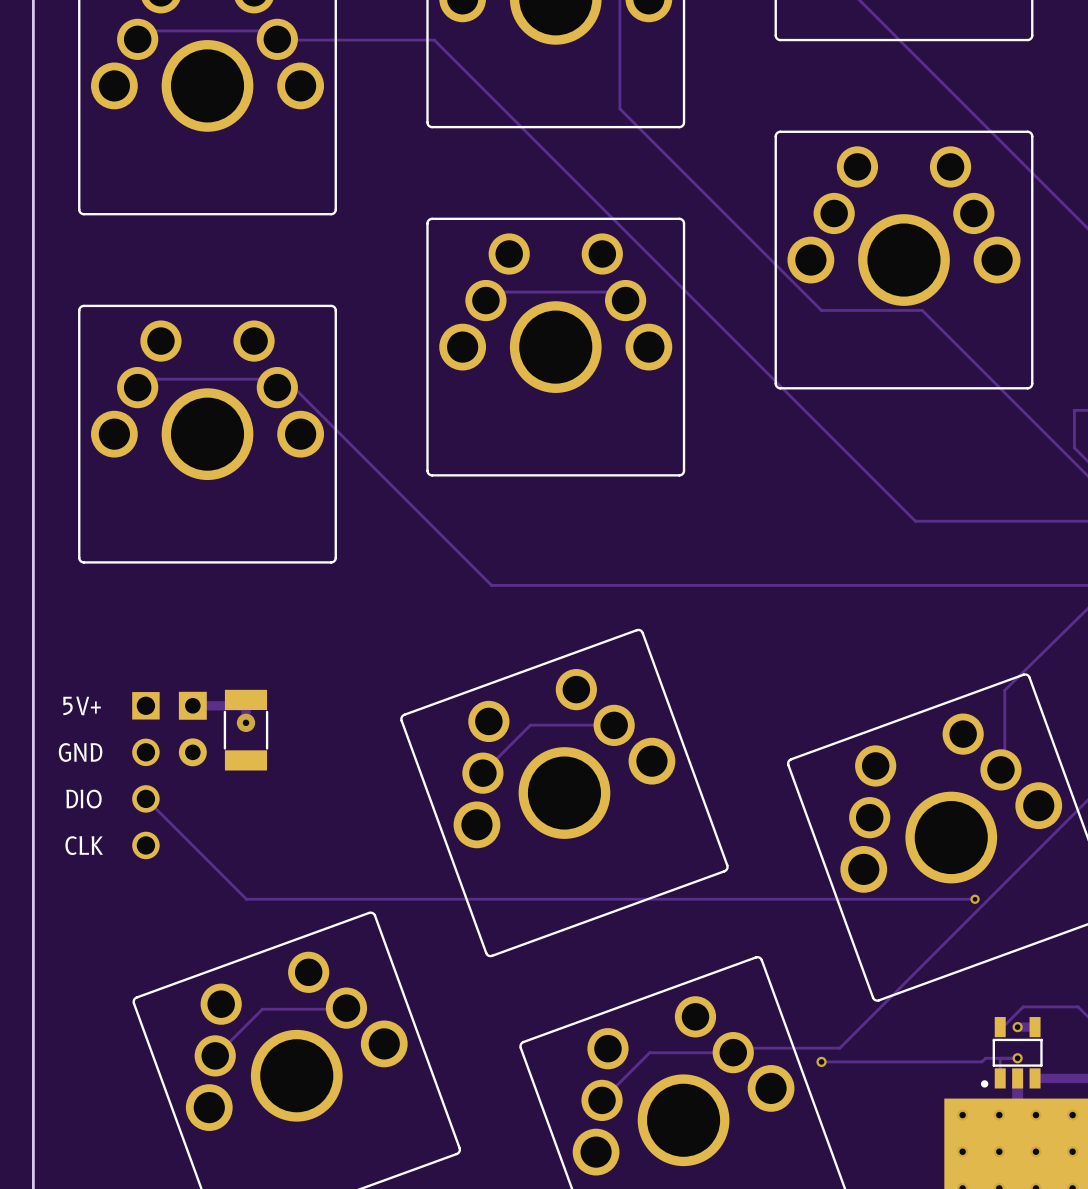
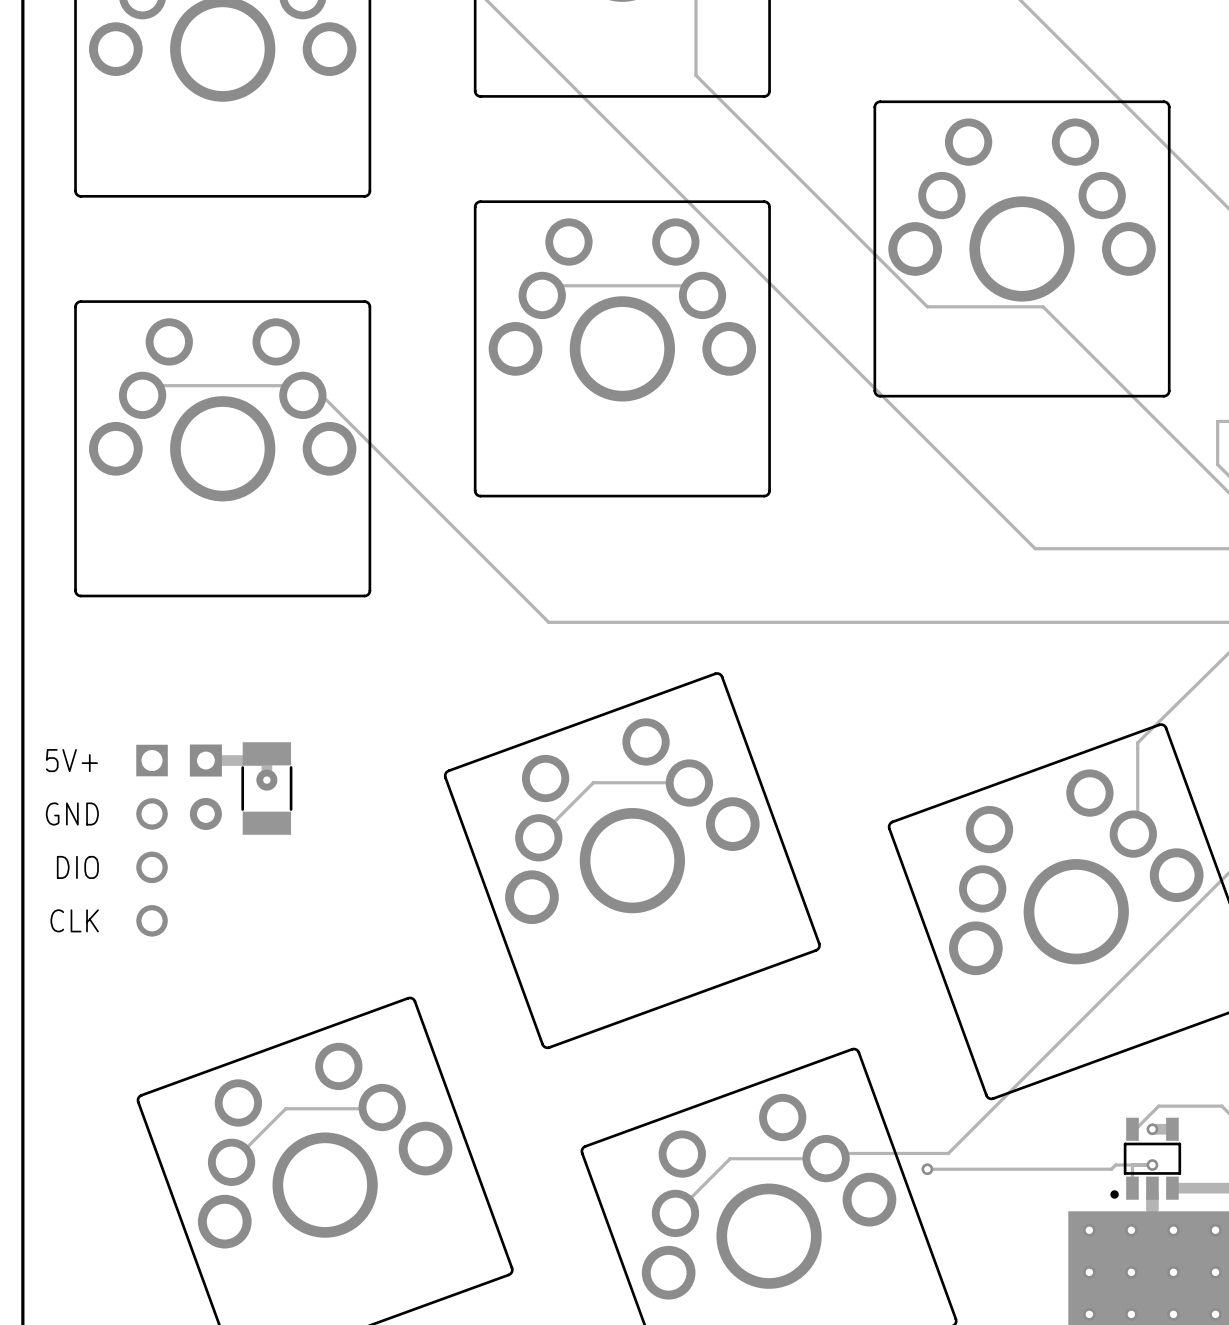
track: (145, 798) (246, 899) (975, 899) -> none
via: (975, 899) -> none

